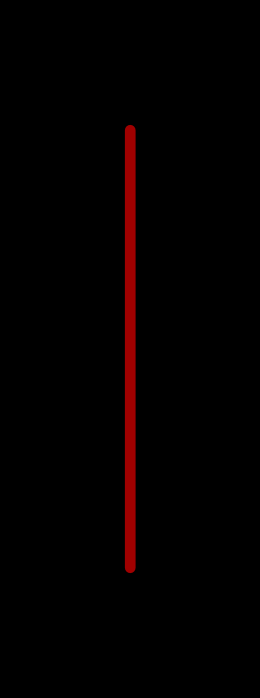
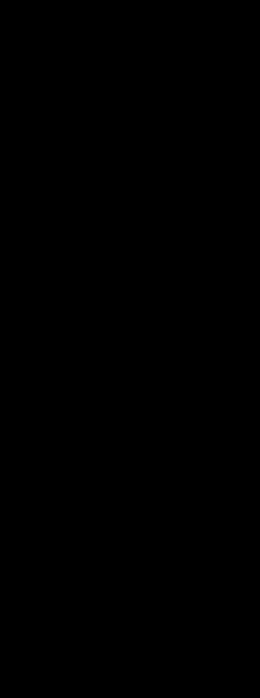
top track: (130, 130) (130, 567) -> none

